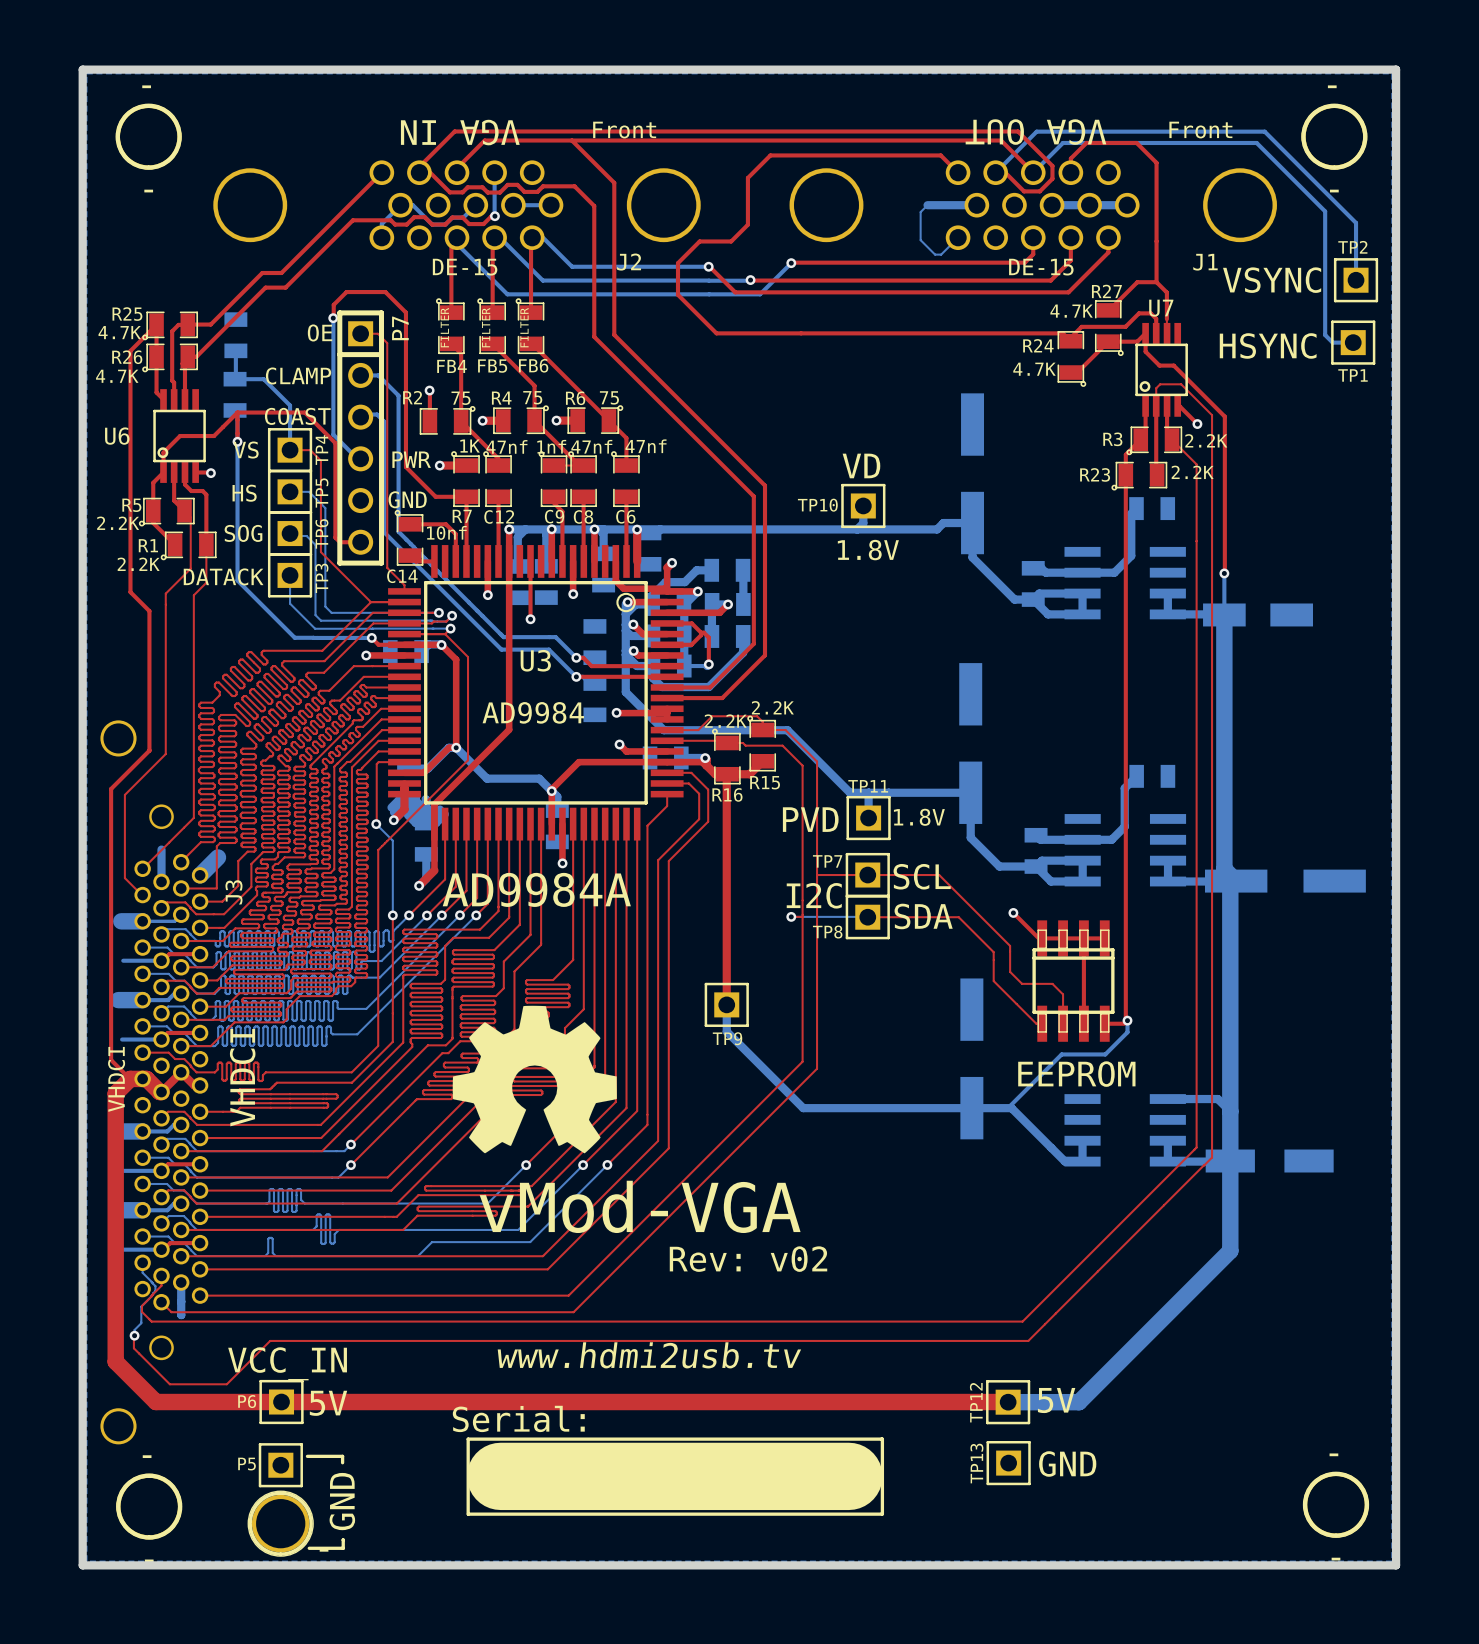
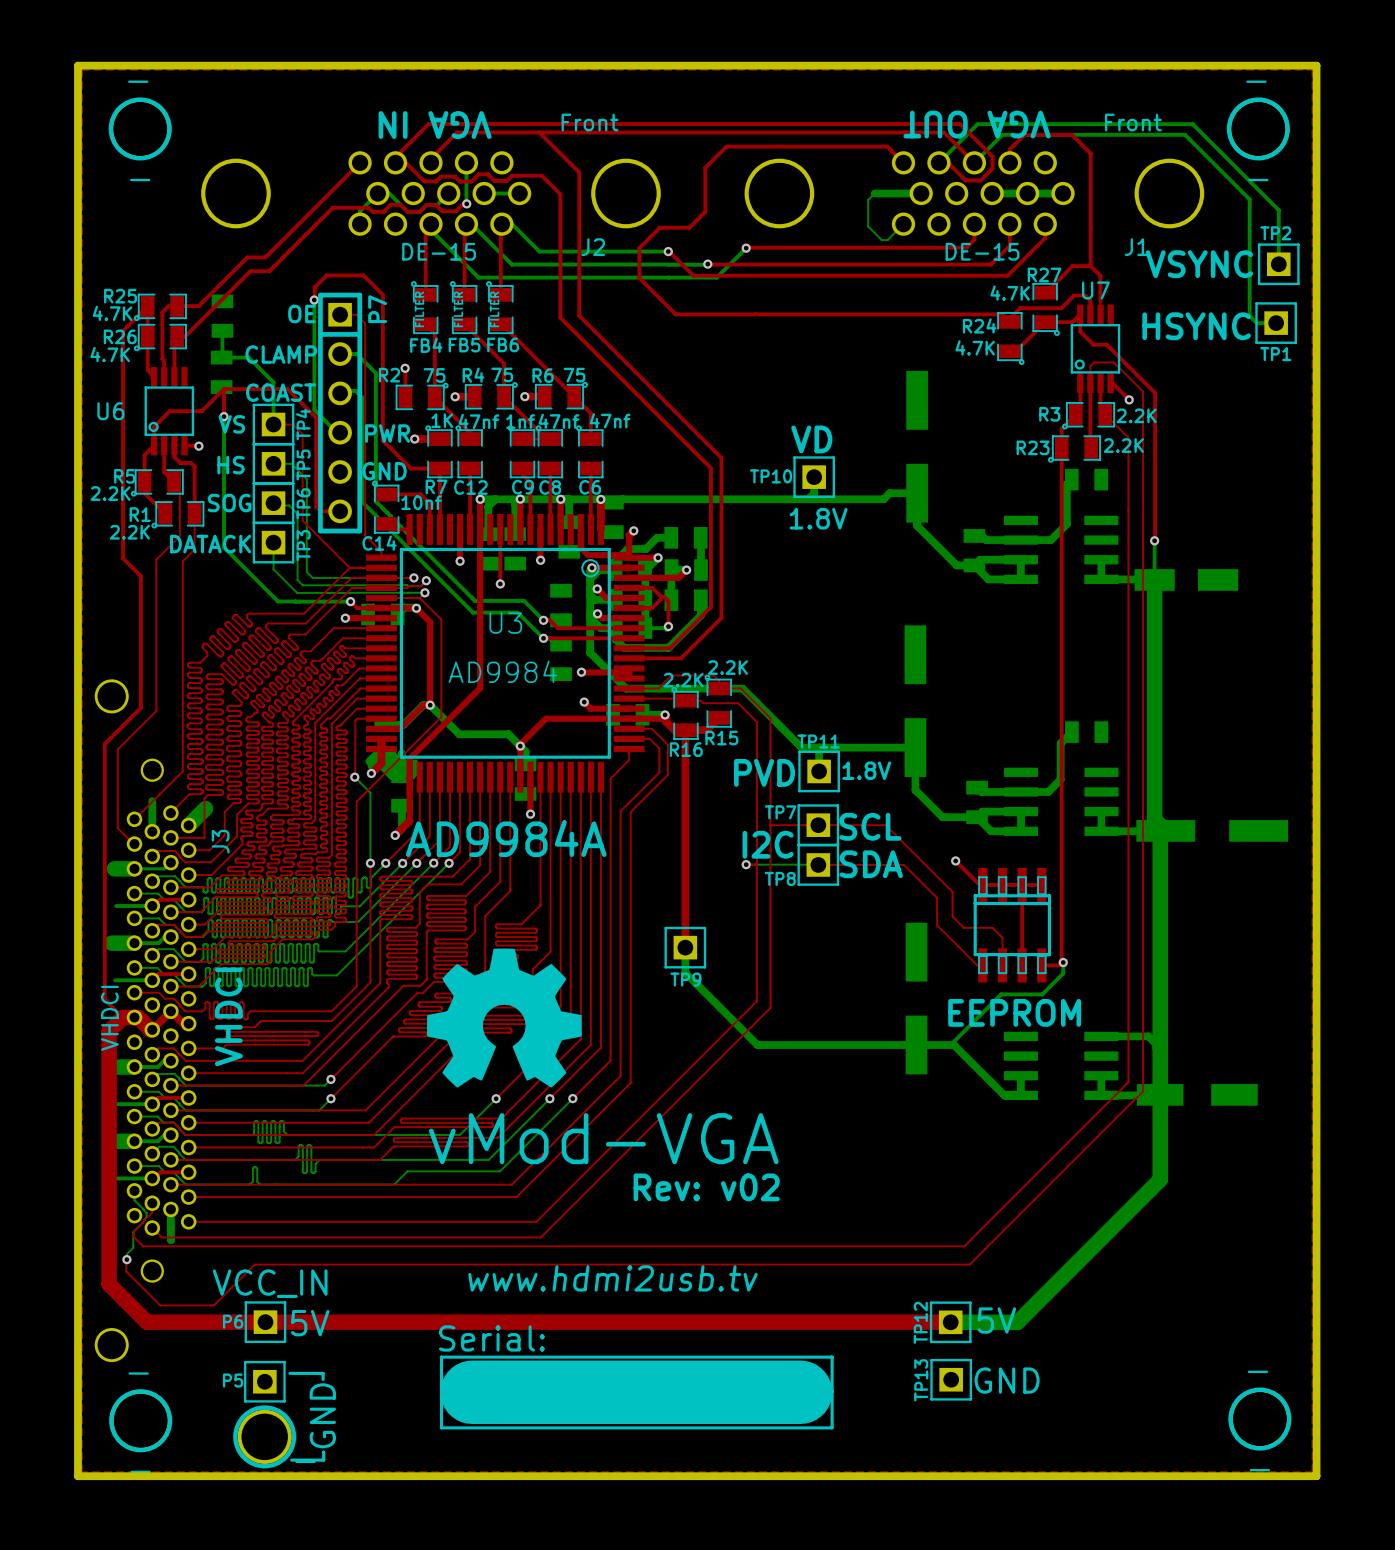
top zone outline: none -> (81, 69) (81, 1472) (1312, 1472) (1312, 69) (81, 69)

